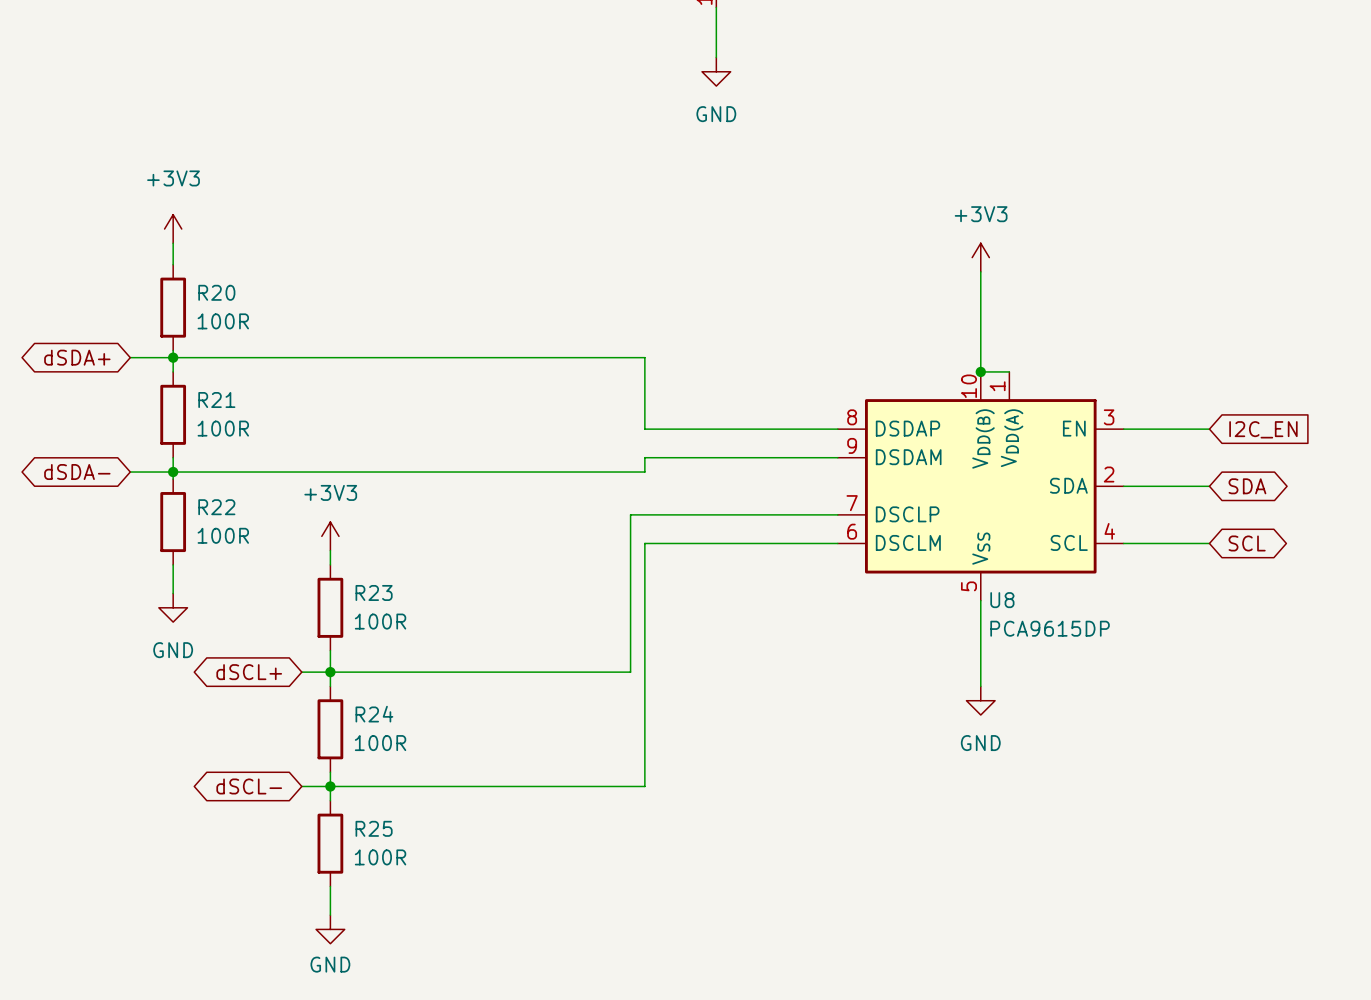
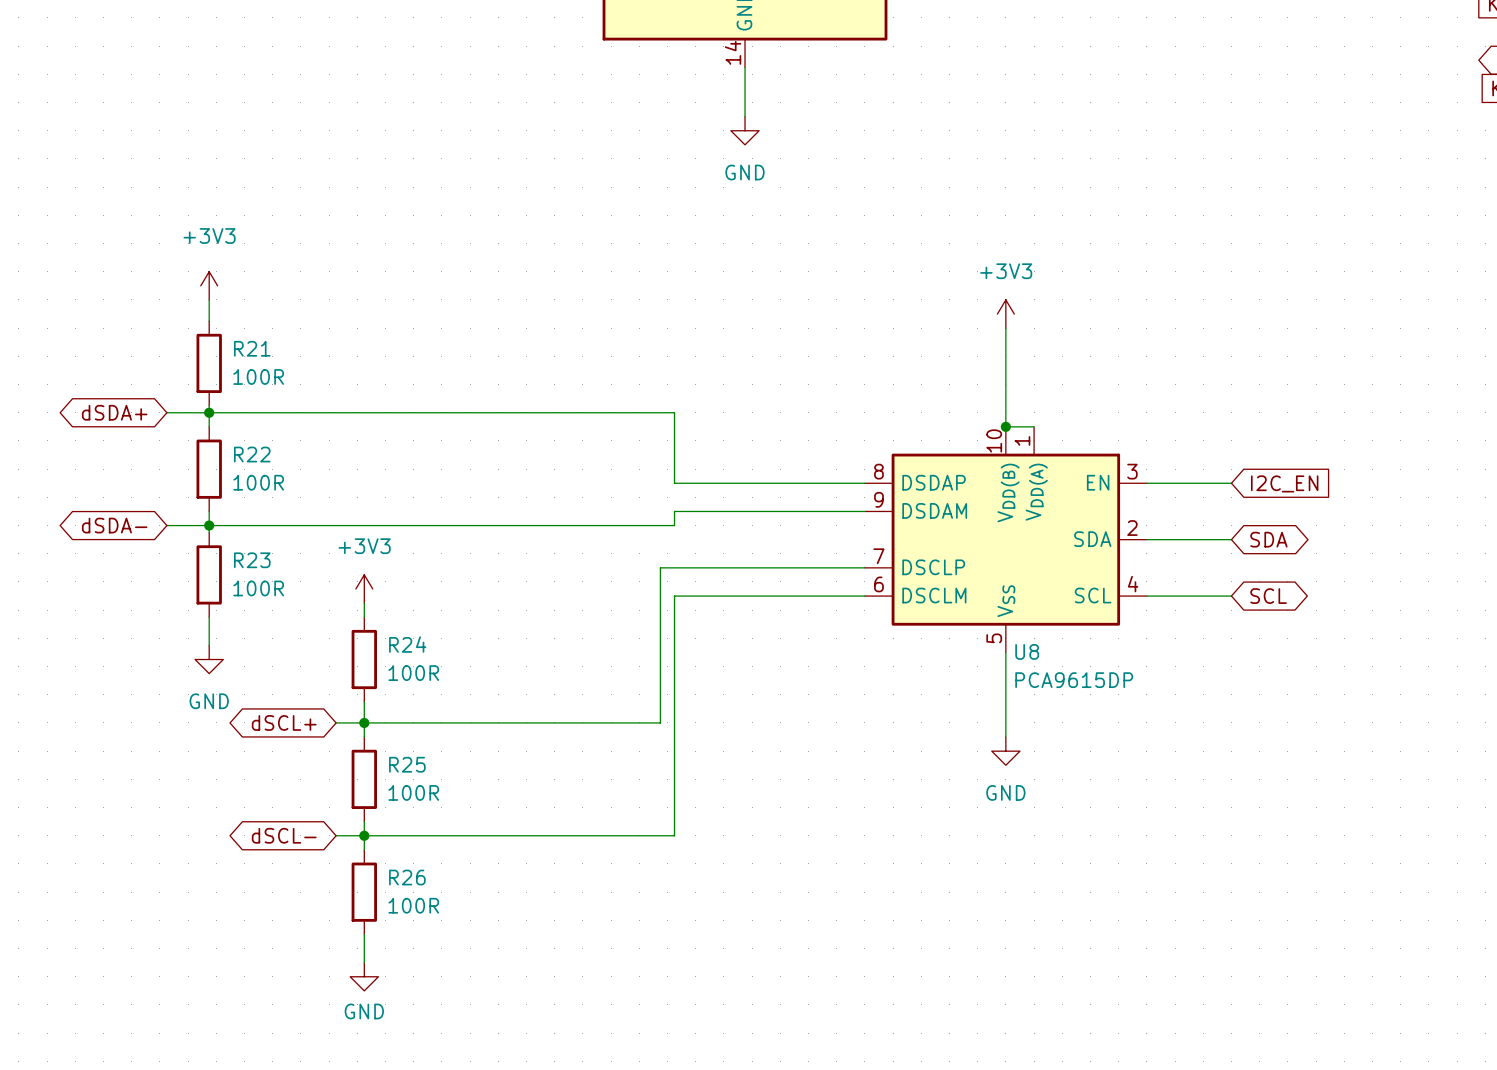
R20 name: R20 (216, 292) -> R21 (252, 348)
R21 name: R21 (216, 400) -> R22 (252, 454)
R22 name: R22 (216, 507) -> R23 (252, 560)
R23 name: R23 (374, 592) -> R24 (407, 644)
R24 name: R24 (374, 714) -> R25 (407, 764)
R25 name: R25 (374, 828) -> R26 (407, 877)

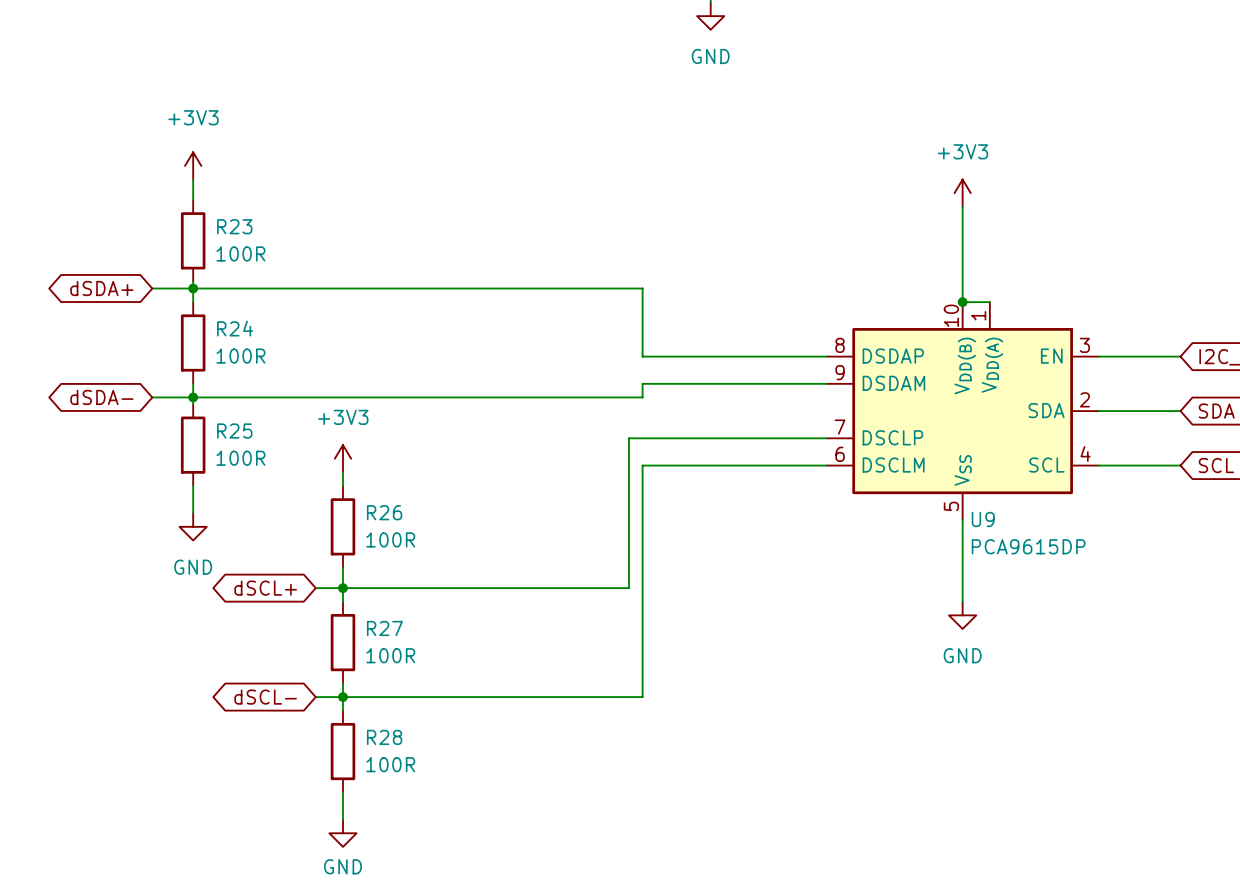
R21 name: R21 (252, 348) -> R23 (234, 226)
R22 name: R22 (252, 454) -> R24 (235, 328)
R23 name: R23 (252, 560) -> R25 (234, 431)
R24 name: R24 (407, 644) -> R26 (384, 512)
U8 name: U8 (1027, 651) -> U9 (983, 519)
R25 name: R25 (407, 764) -> R27 (384, 628)
R26 name: R26 (407, 877) -> R28 (384, 737)

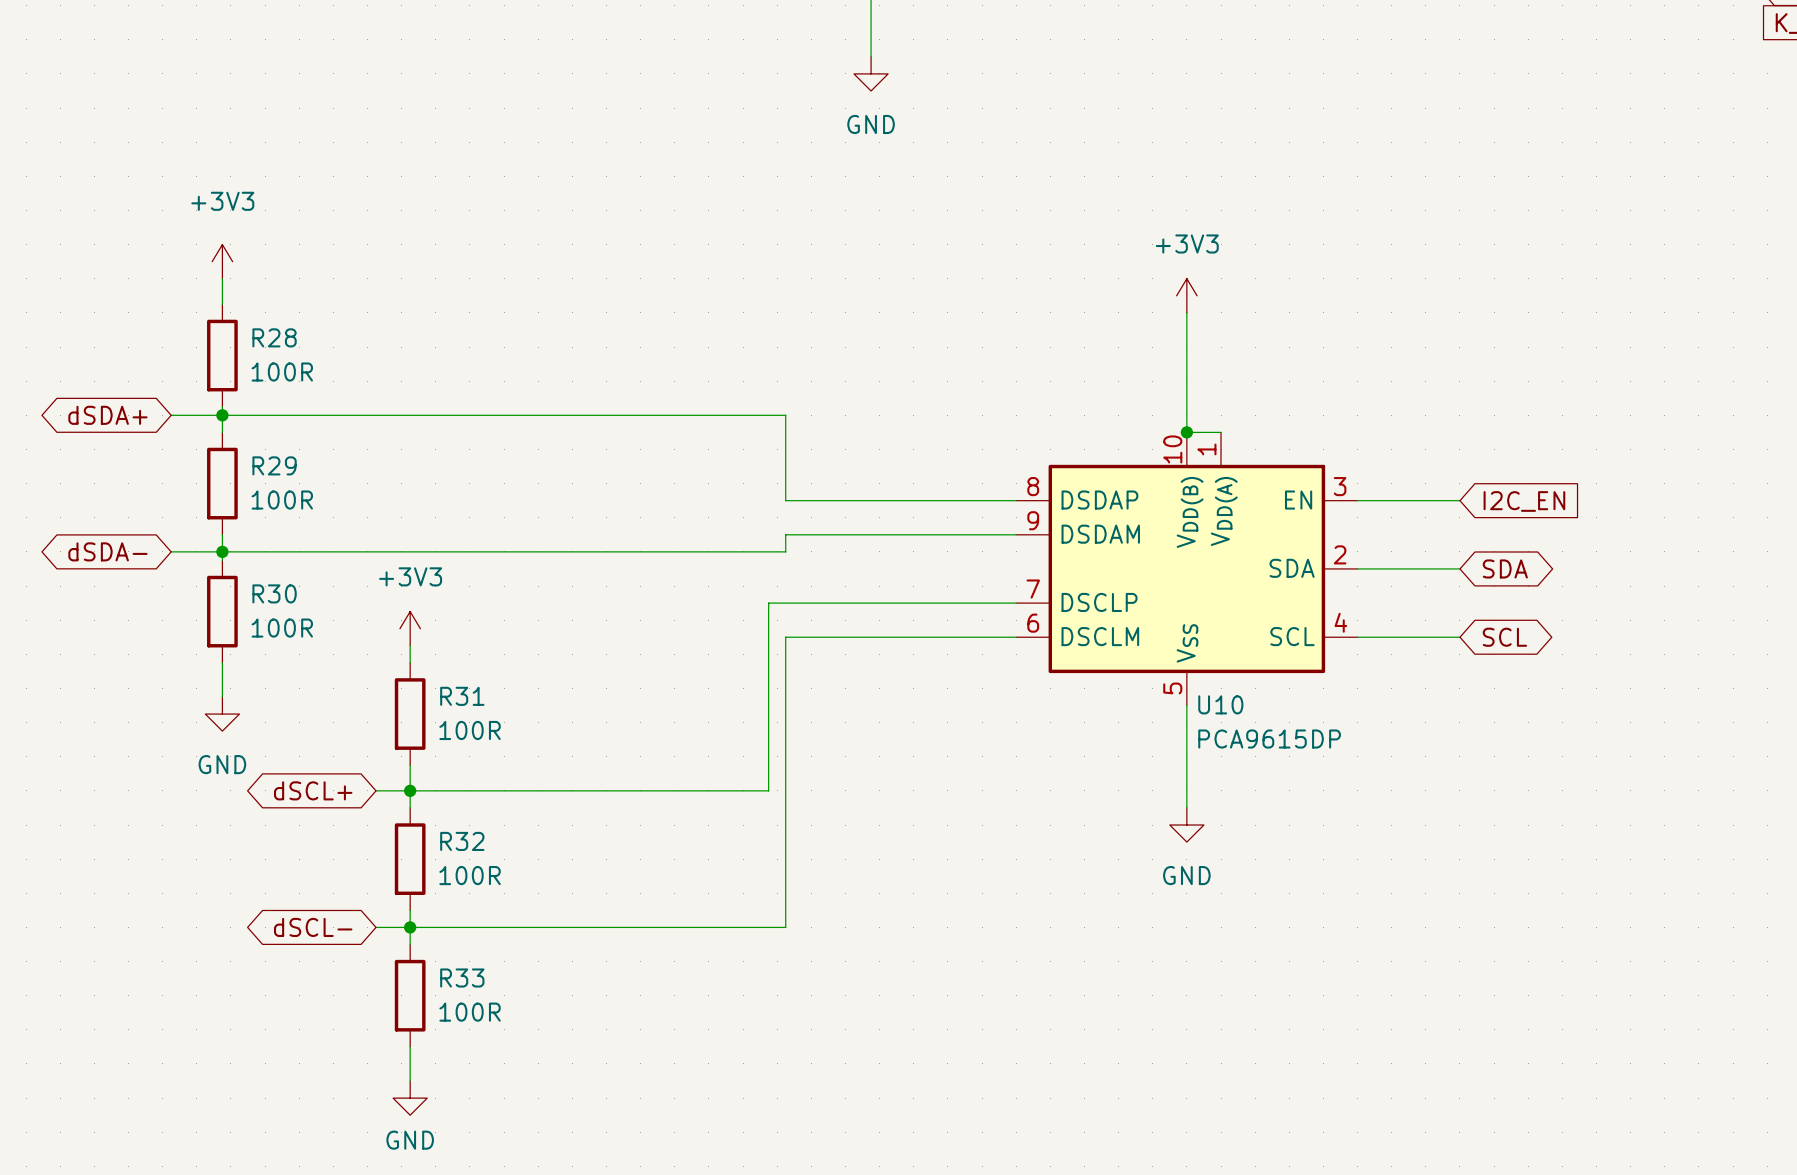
R23 name: R23 (234, 226) -> R28 (274, 337)
R24 name: R24 (235, 328) -> R29 (274, 465)
R25 name: R25 (234, 431) -> R30 (274, 593)
R26 name: R26 (384, 512) -> R31 (462, 696)
U9 name: U9 (983, 519) -> U10 (1220, 704)
R27 name: R27 (384, 628) -> R32 (462, 841)
R28 name: R28 (384, 737) -> R33 (462, 977)

